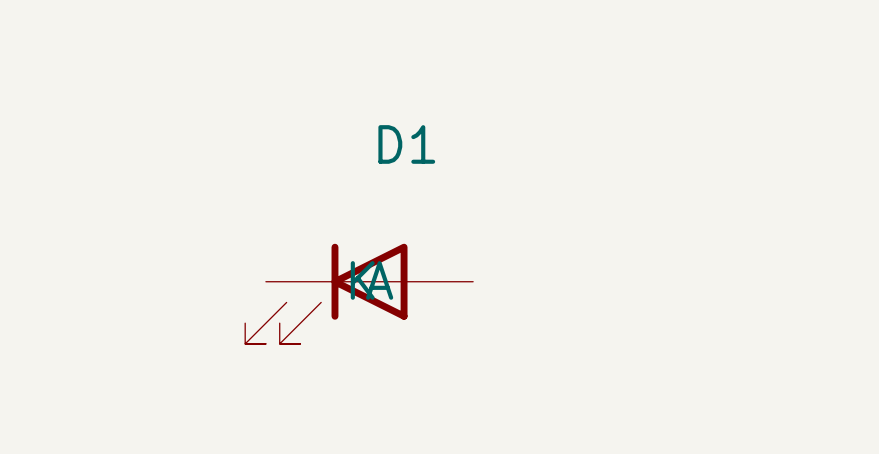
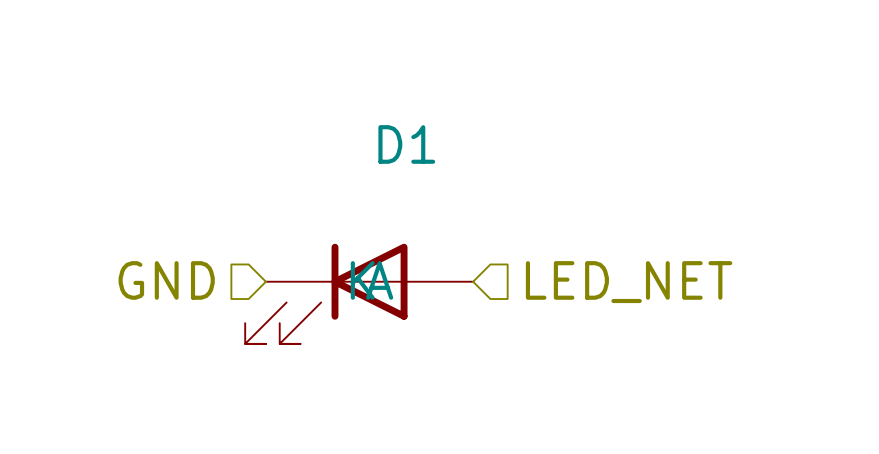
hierarchical label: none -> GND (166, 280)
hierarchical label: none -> LED_NET (629, 282)

